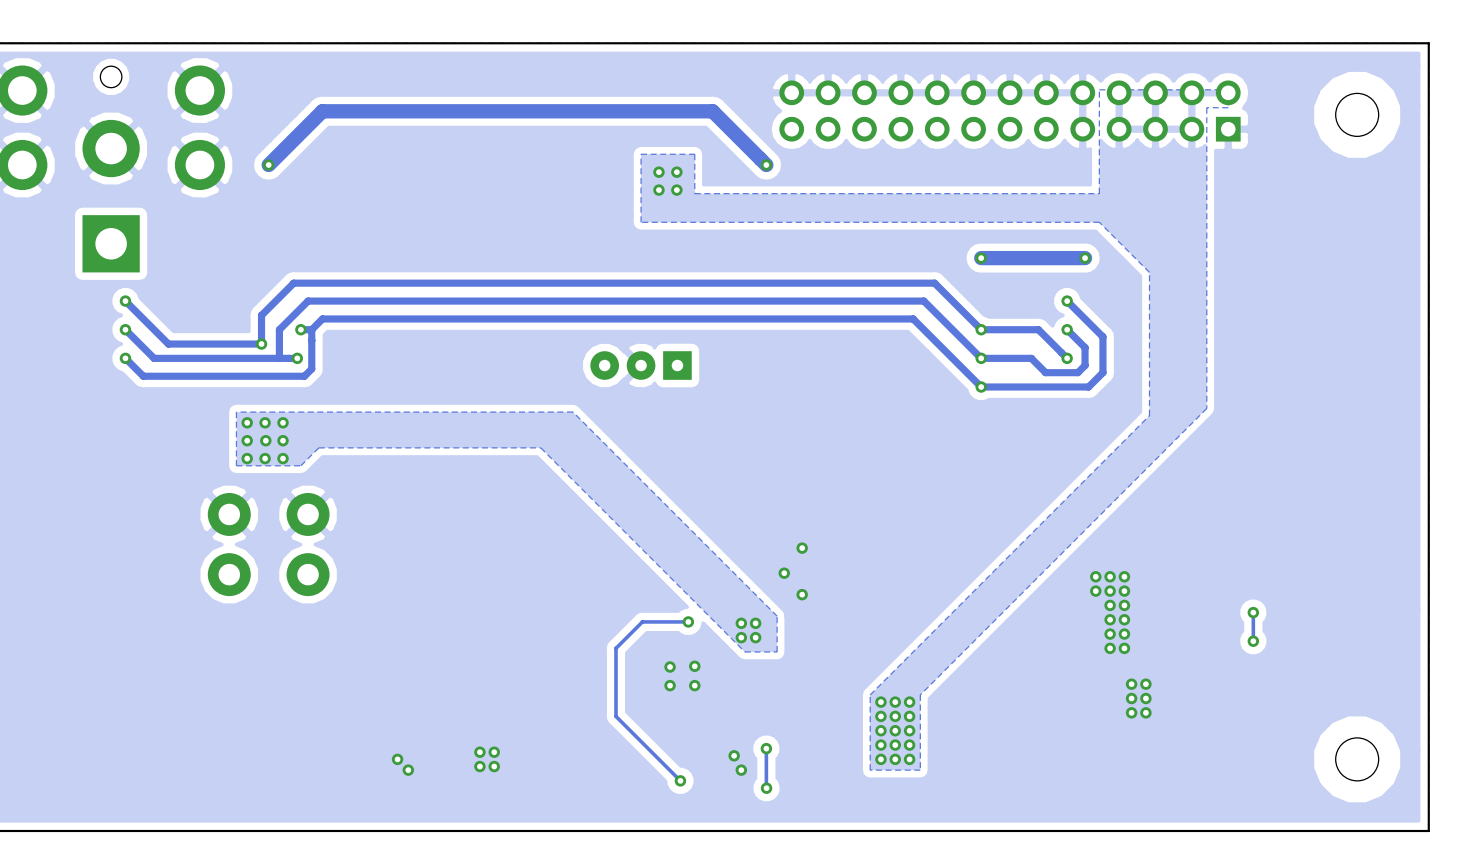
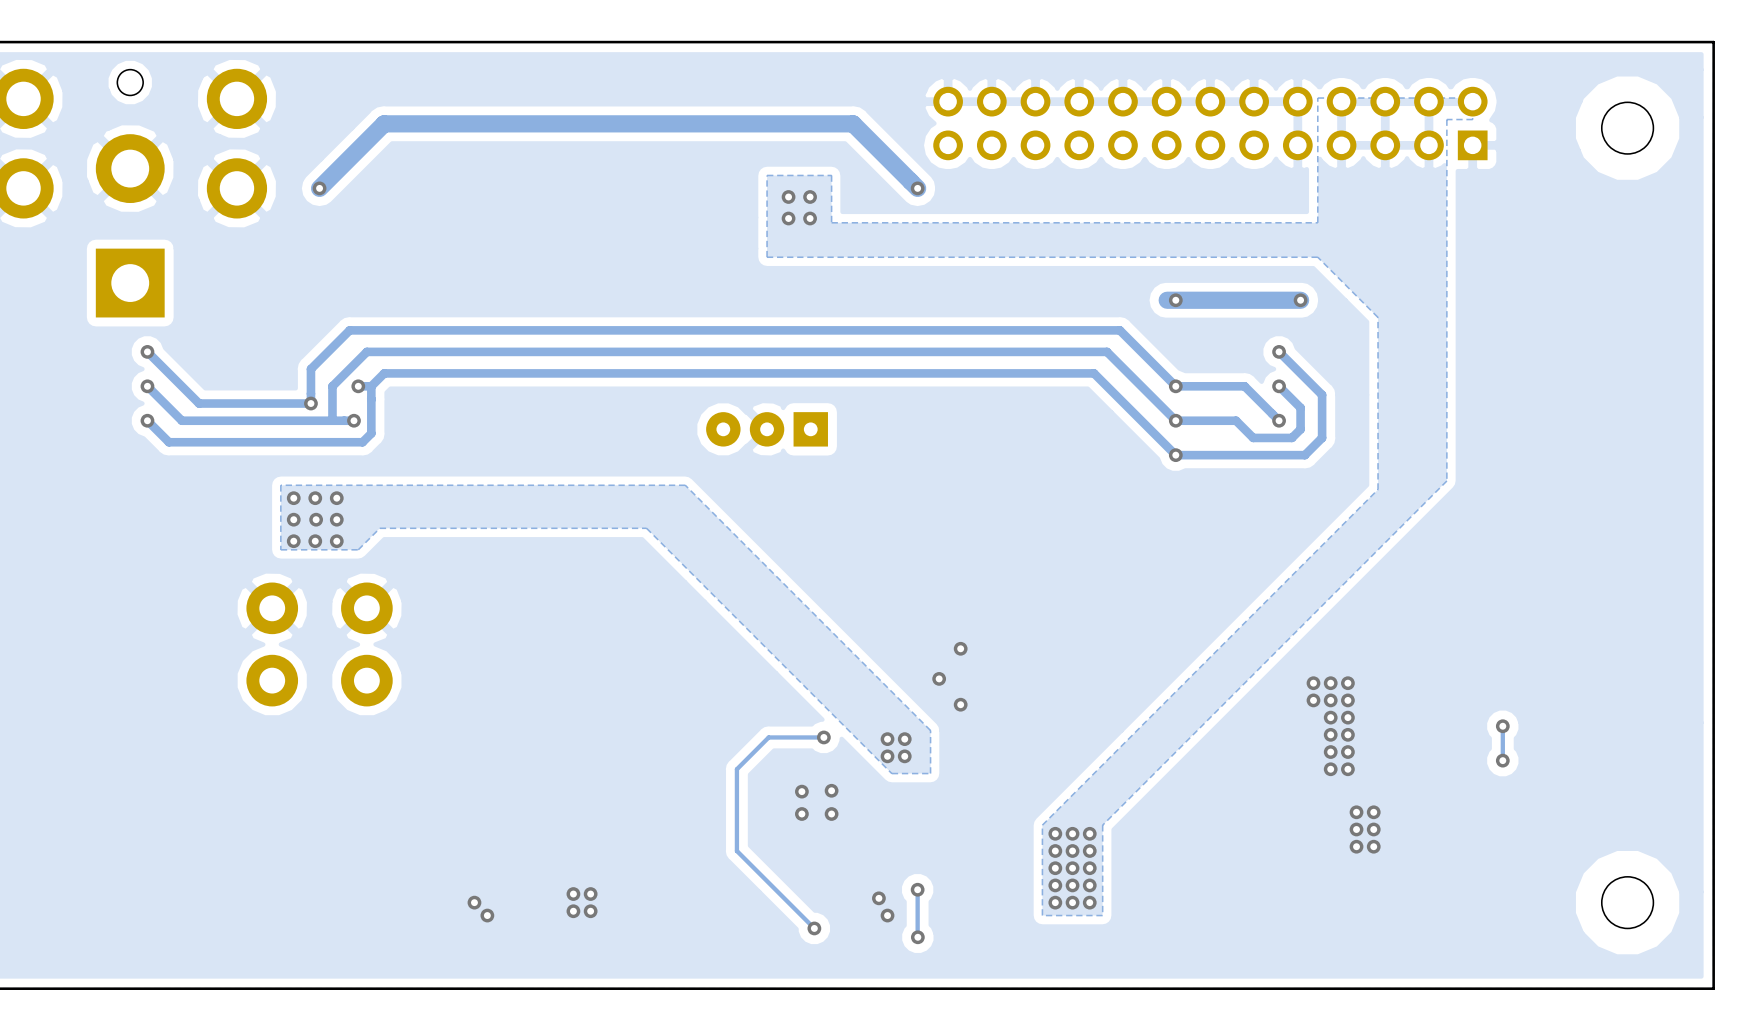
track: none -> (1175, 300) (1167, 300)

